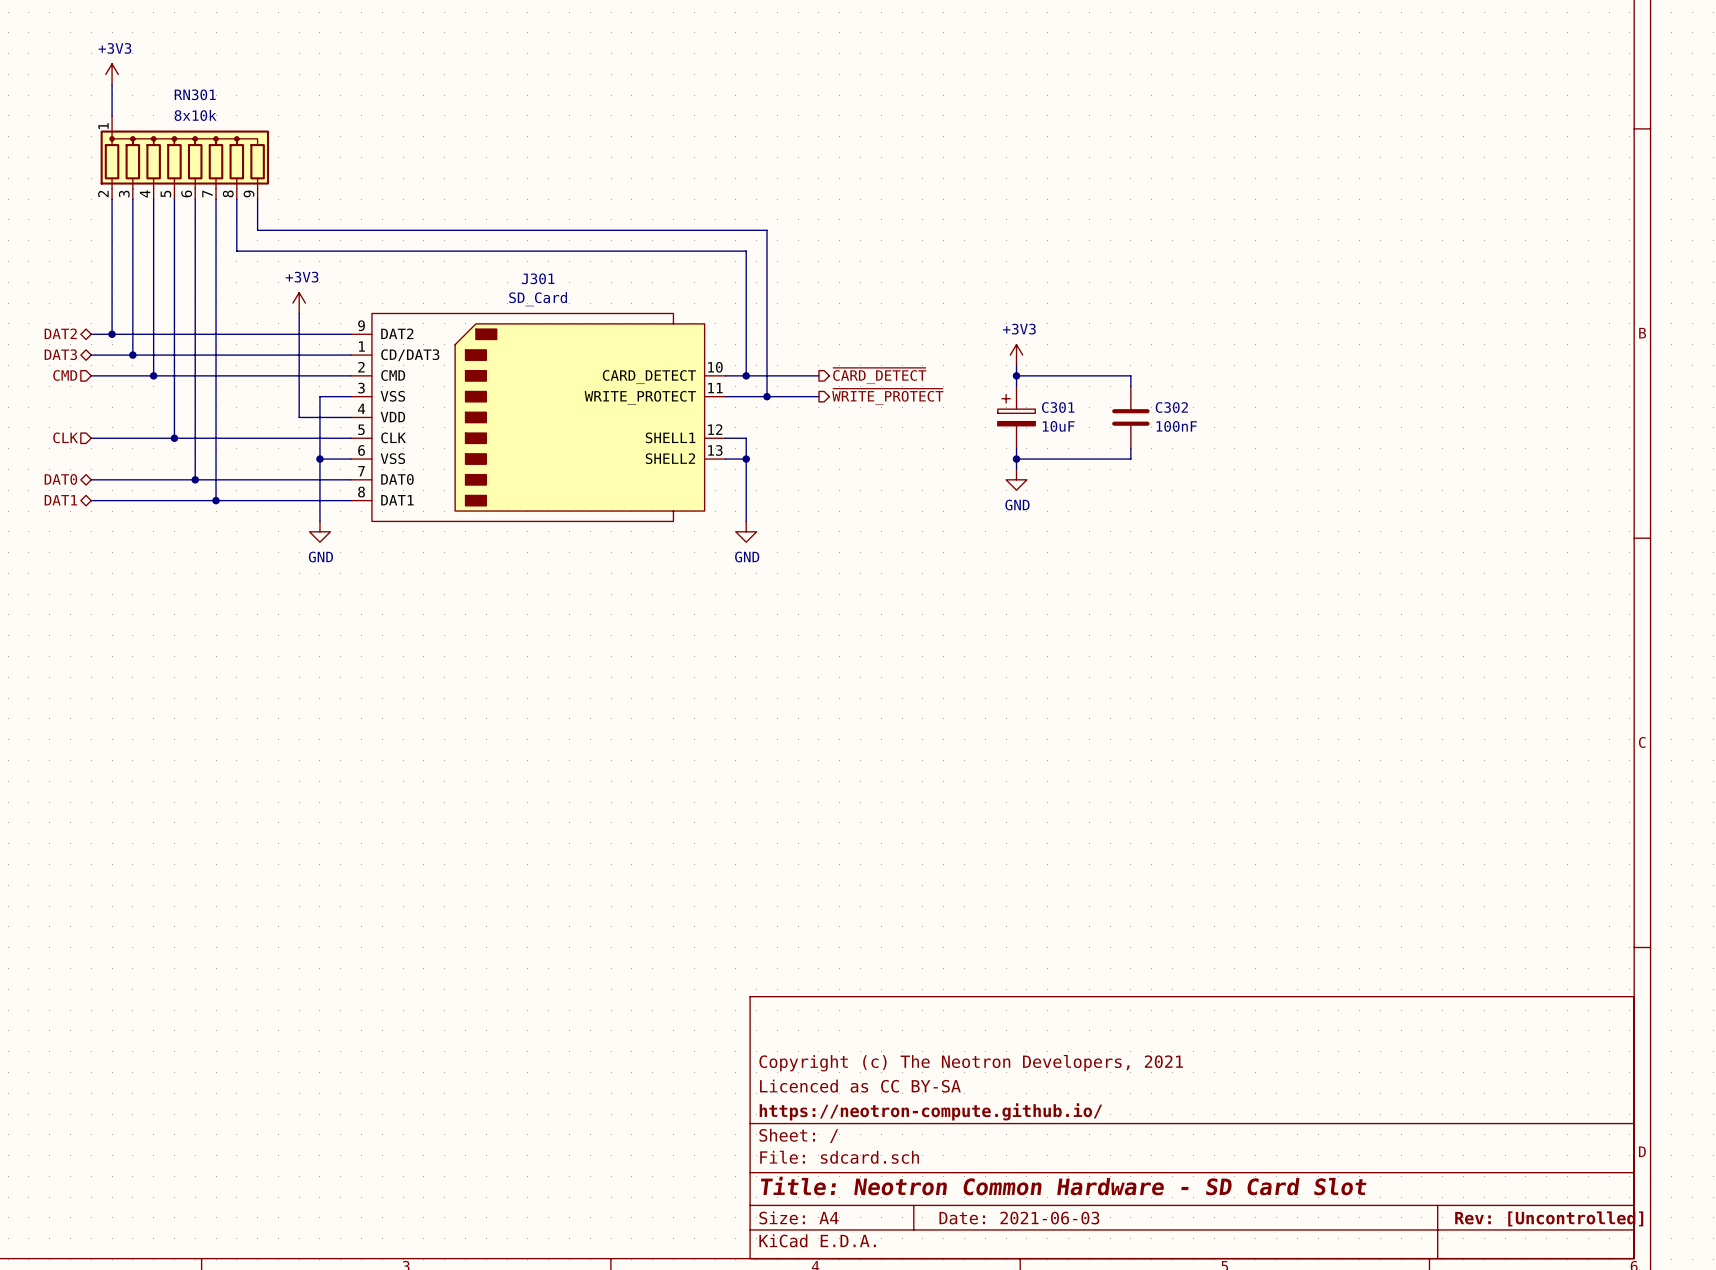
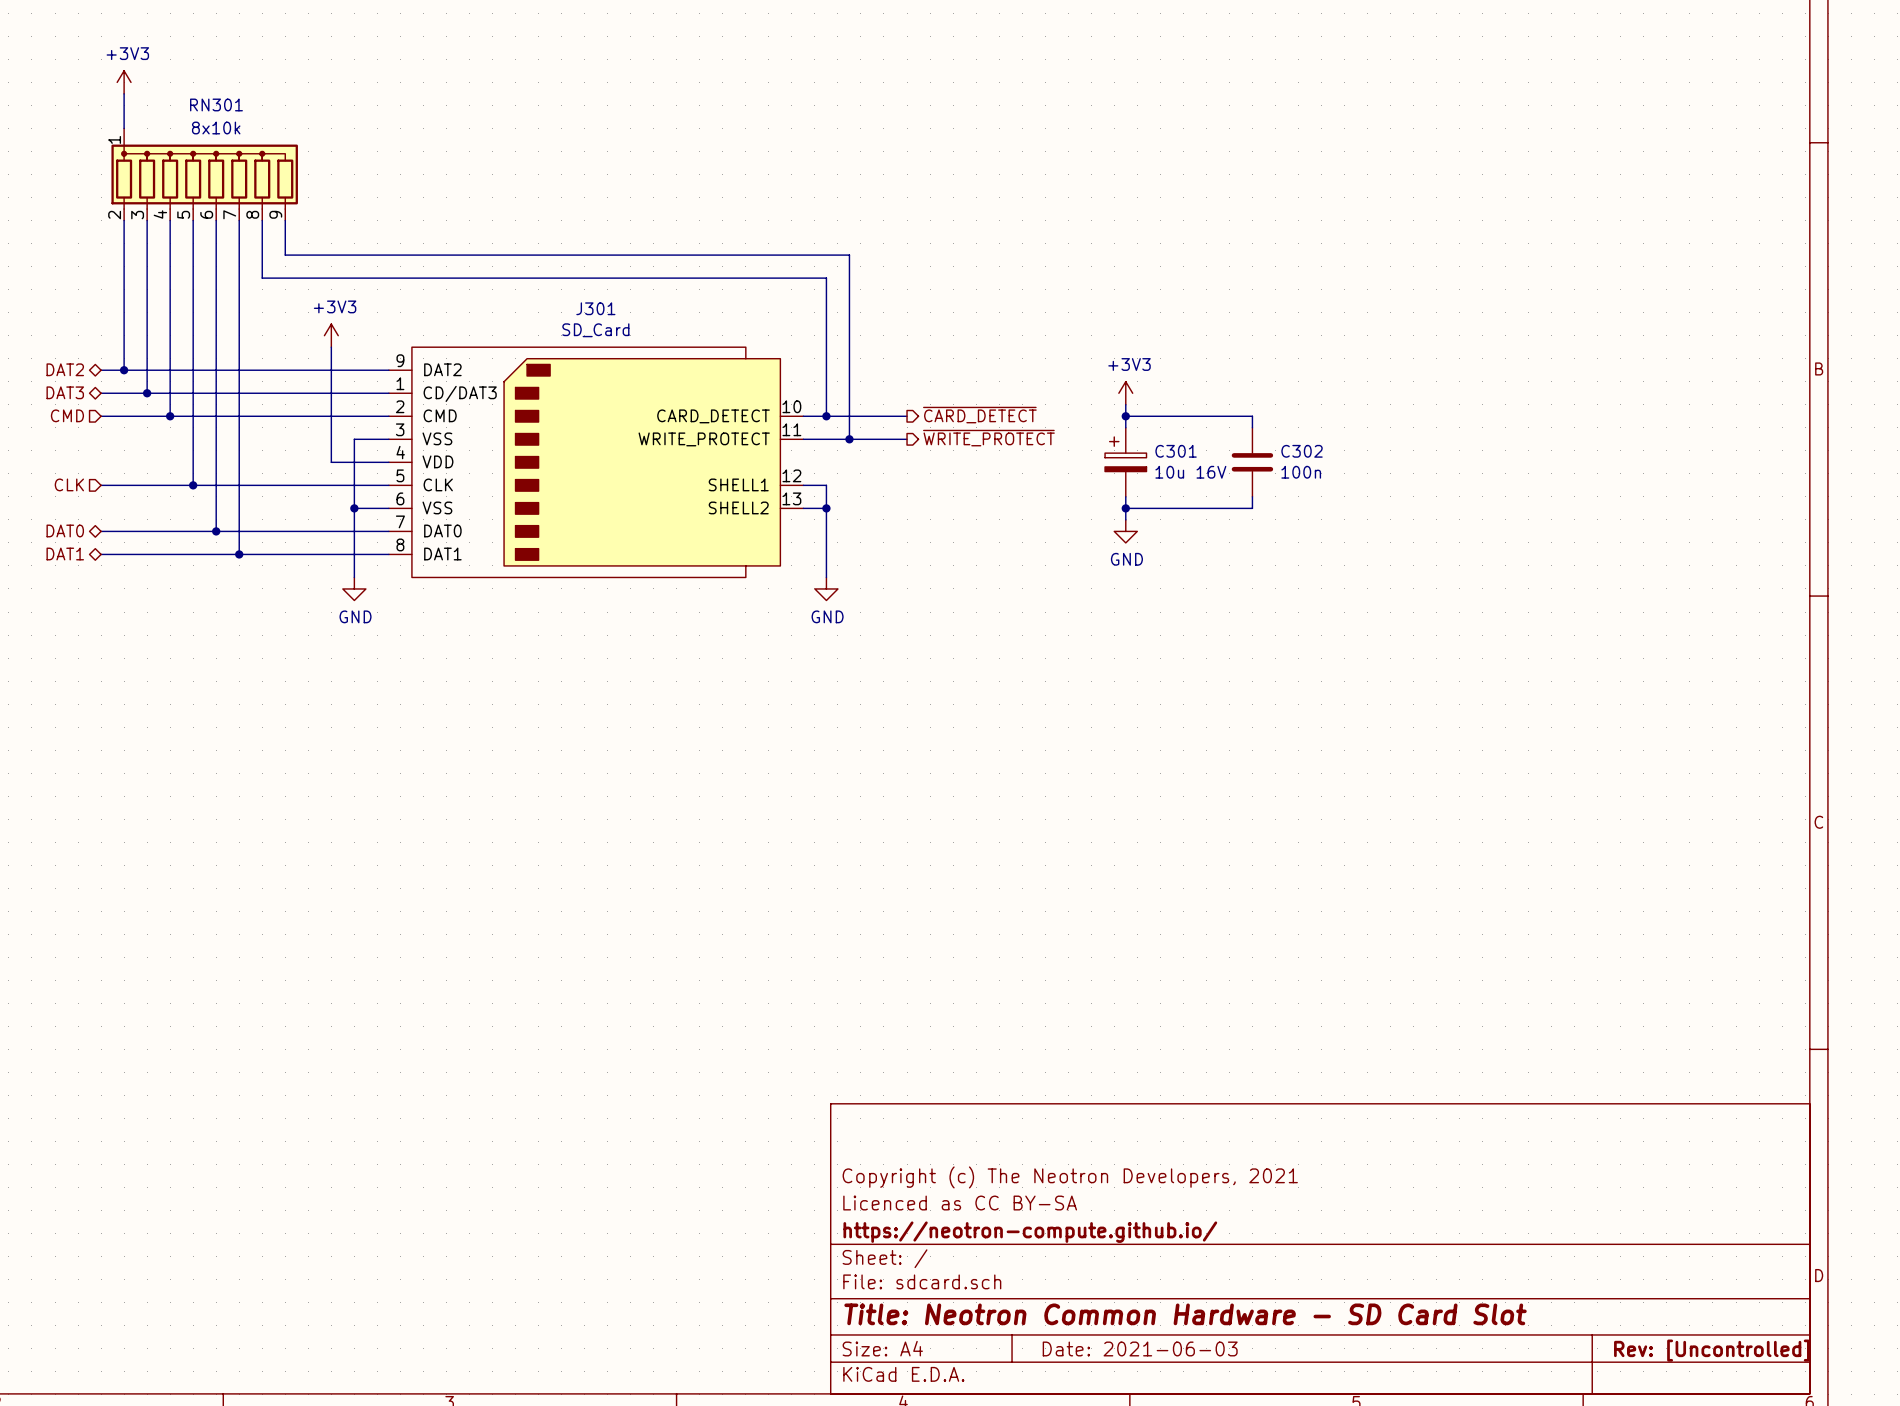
C301 value: 10uF (1058, 426) -> 10u 16V (1190, 472)
C302 value: 100nF (1176, 426) -> 100n (1301, 472)

